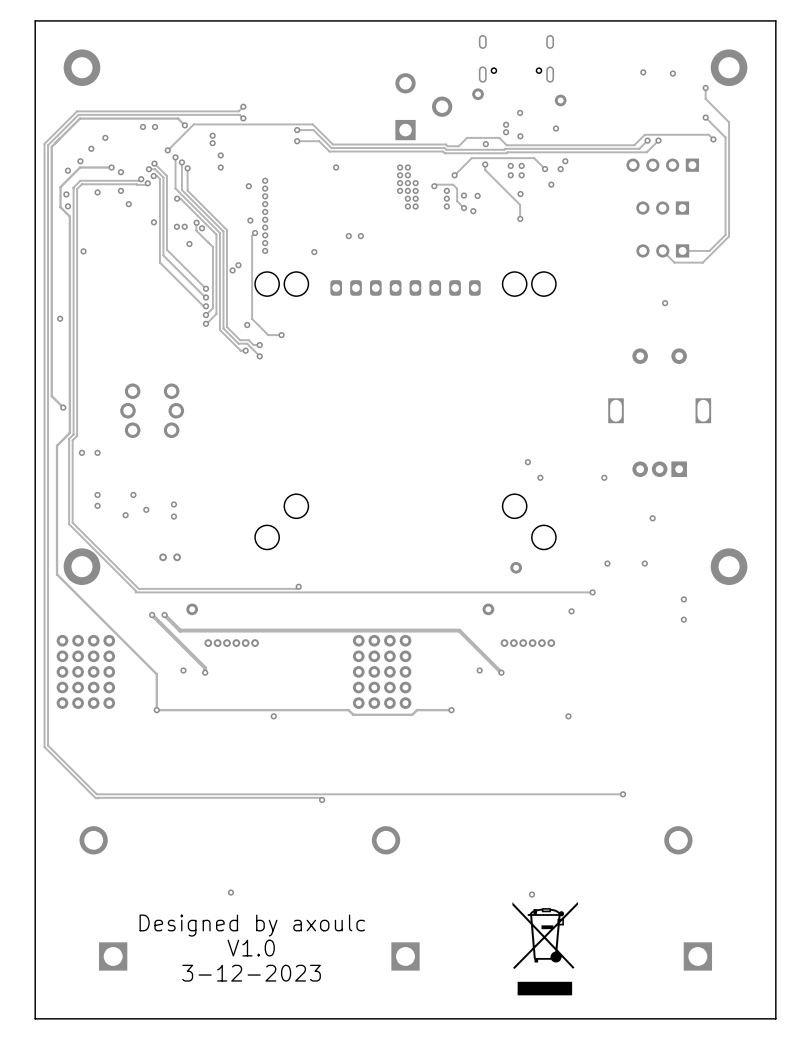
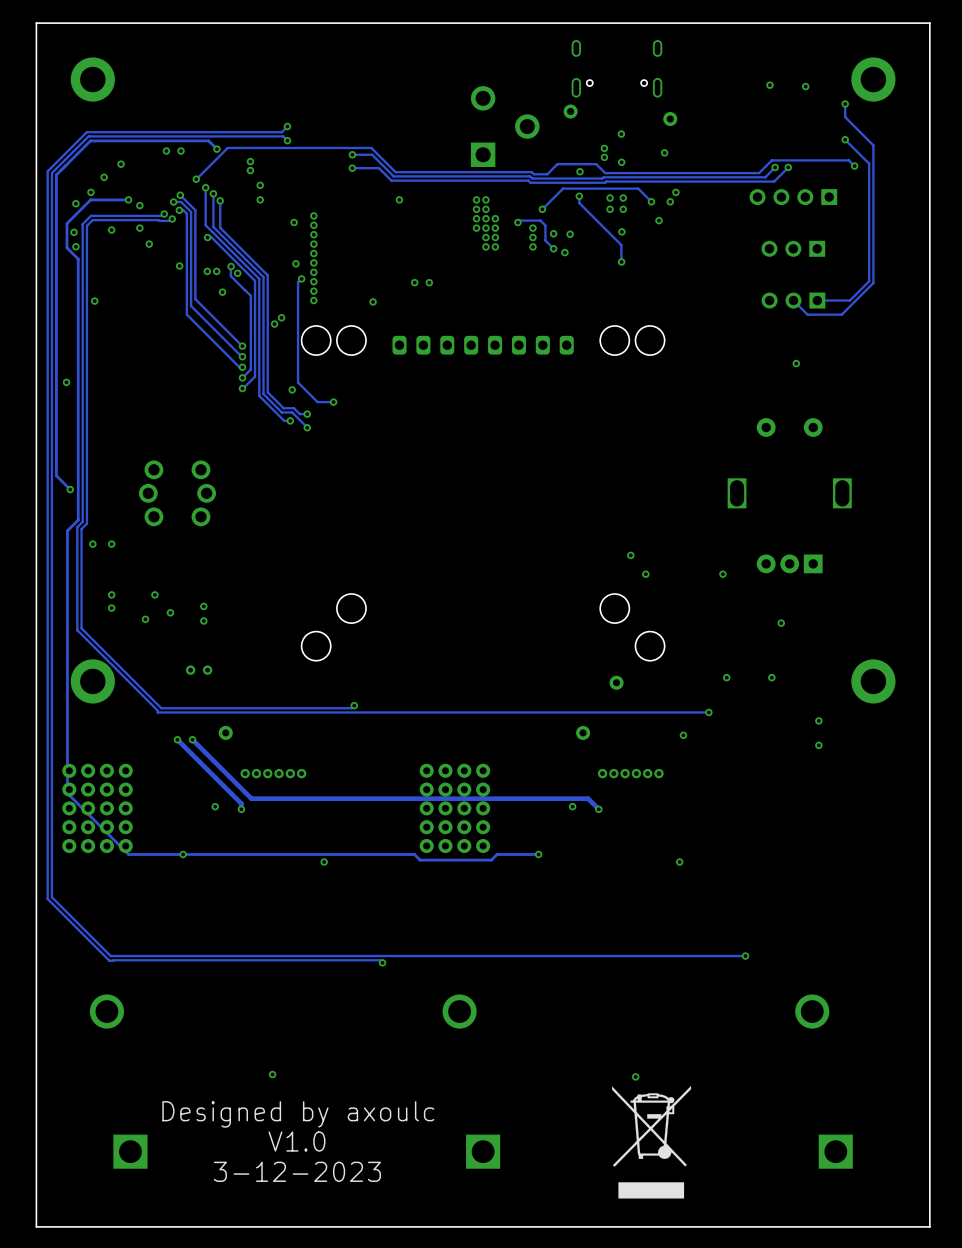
track: (60, 441) (57, 445) (57, 574) (156, 674) (156, 710) -> (67, 530) (67, 793) (128, 854) (183, 854)
track: (180, 630) (459, 630) (492, 663) -> (211, 758) (251, 798) (588, 798)

